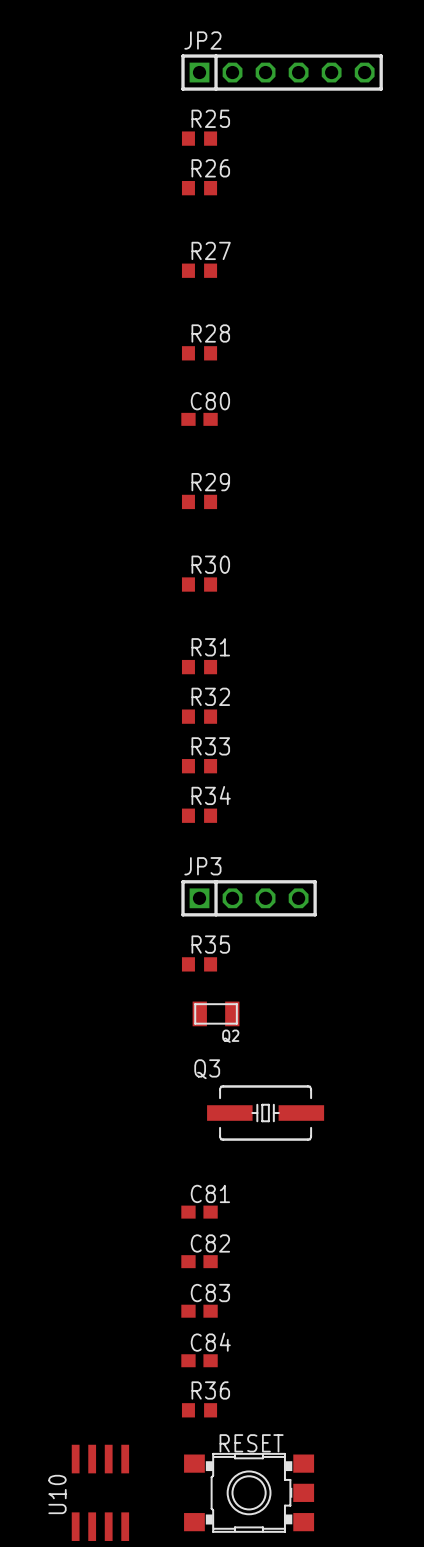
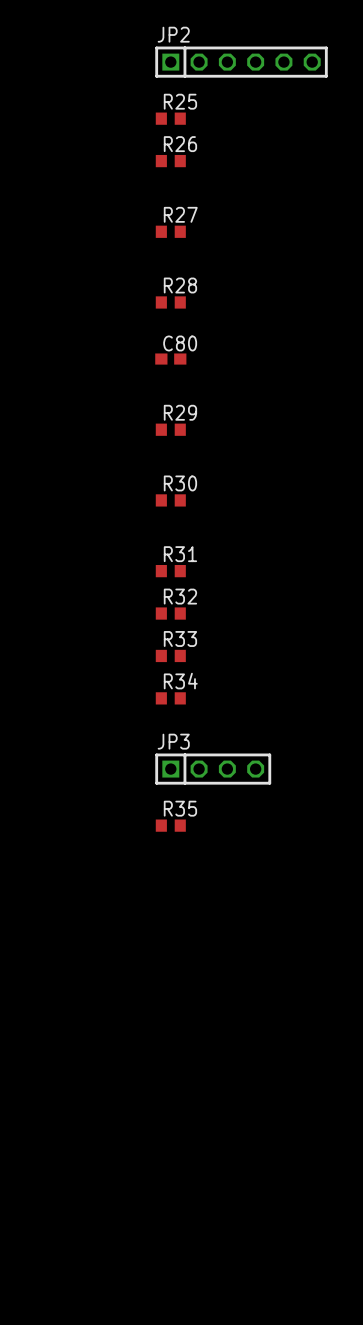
Q2: (216, 1013) -> none
Q3: (265, 1113) -> none
C81: (199, 1212) -> none
C82: (199, 1261) -> none
C83: (199, 1311) -> none
C84: (199, 1360) -> none
R36: (199, 1410) -> none
U10: (100, 1492) -> none
RESET: (249, 1492) -> none

